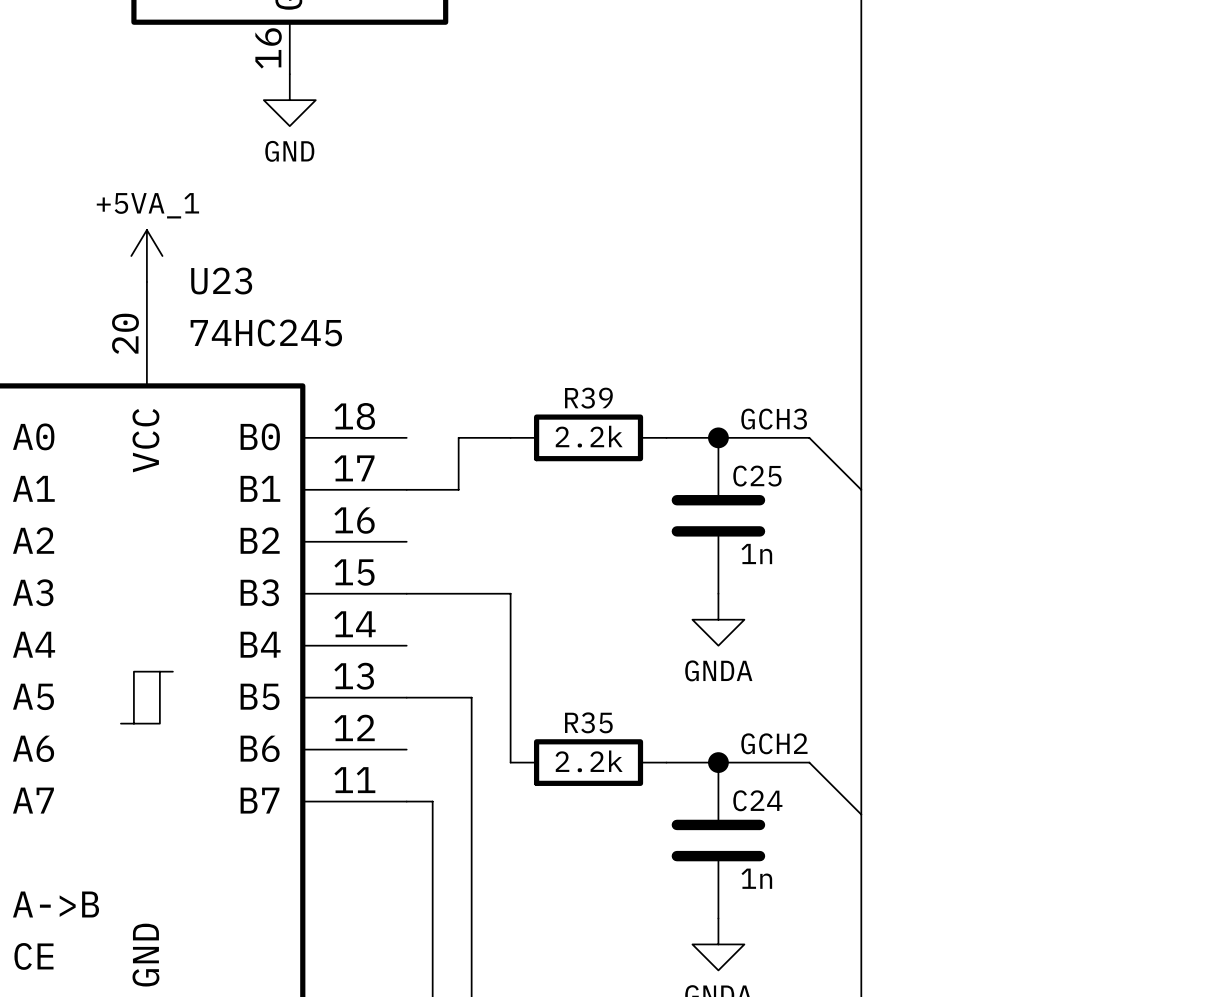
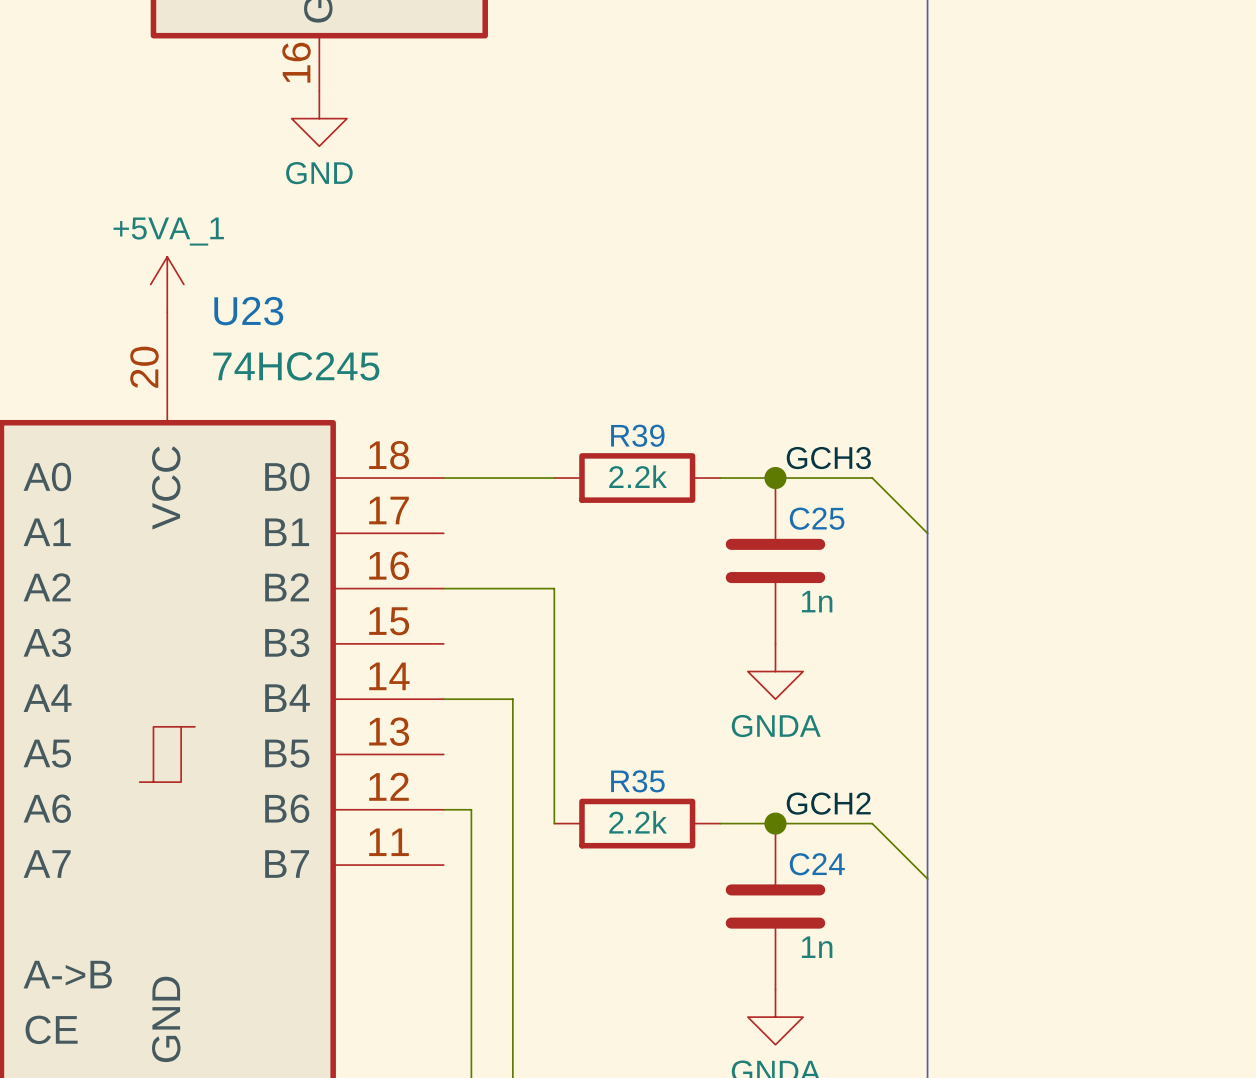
wire: (458, 437) (458, 489) (406, 489) -> (499, 478) (443, 478)
wire: (406, 593) (510, 593) -> (443, 588) (554, 588) (554, 643)
wire: (406, 697) (471, 697) -> (443, 699) (512, 699) (512, 754)
wire: (406, 801) (432, 801) -> (443, 809) (471, 809) (471, 865)

